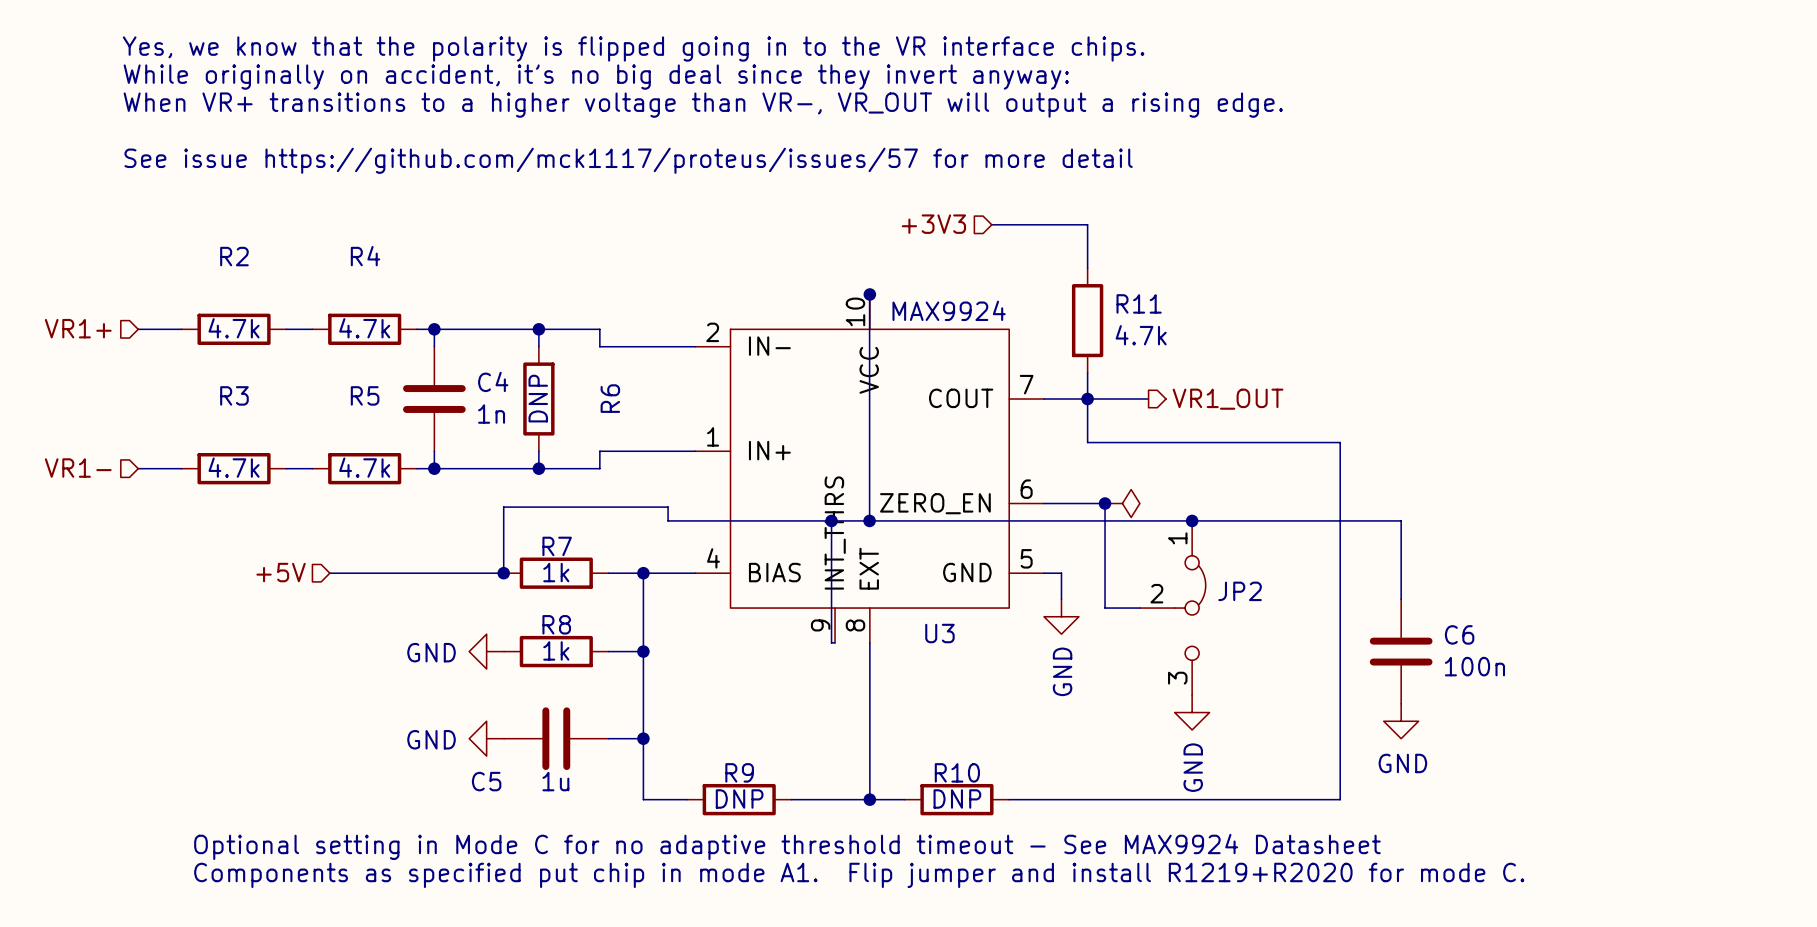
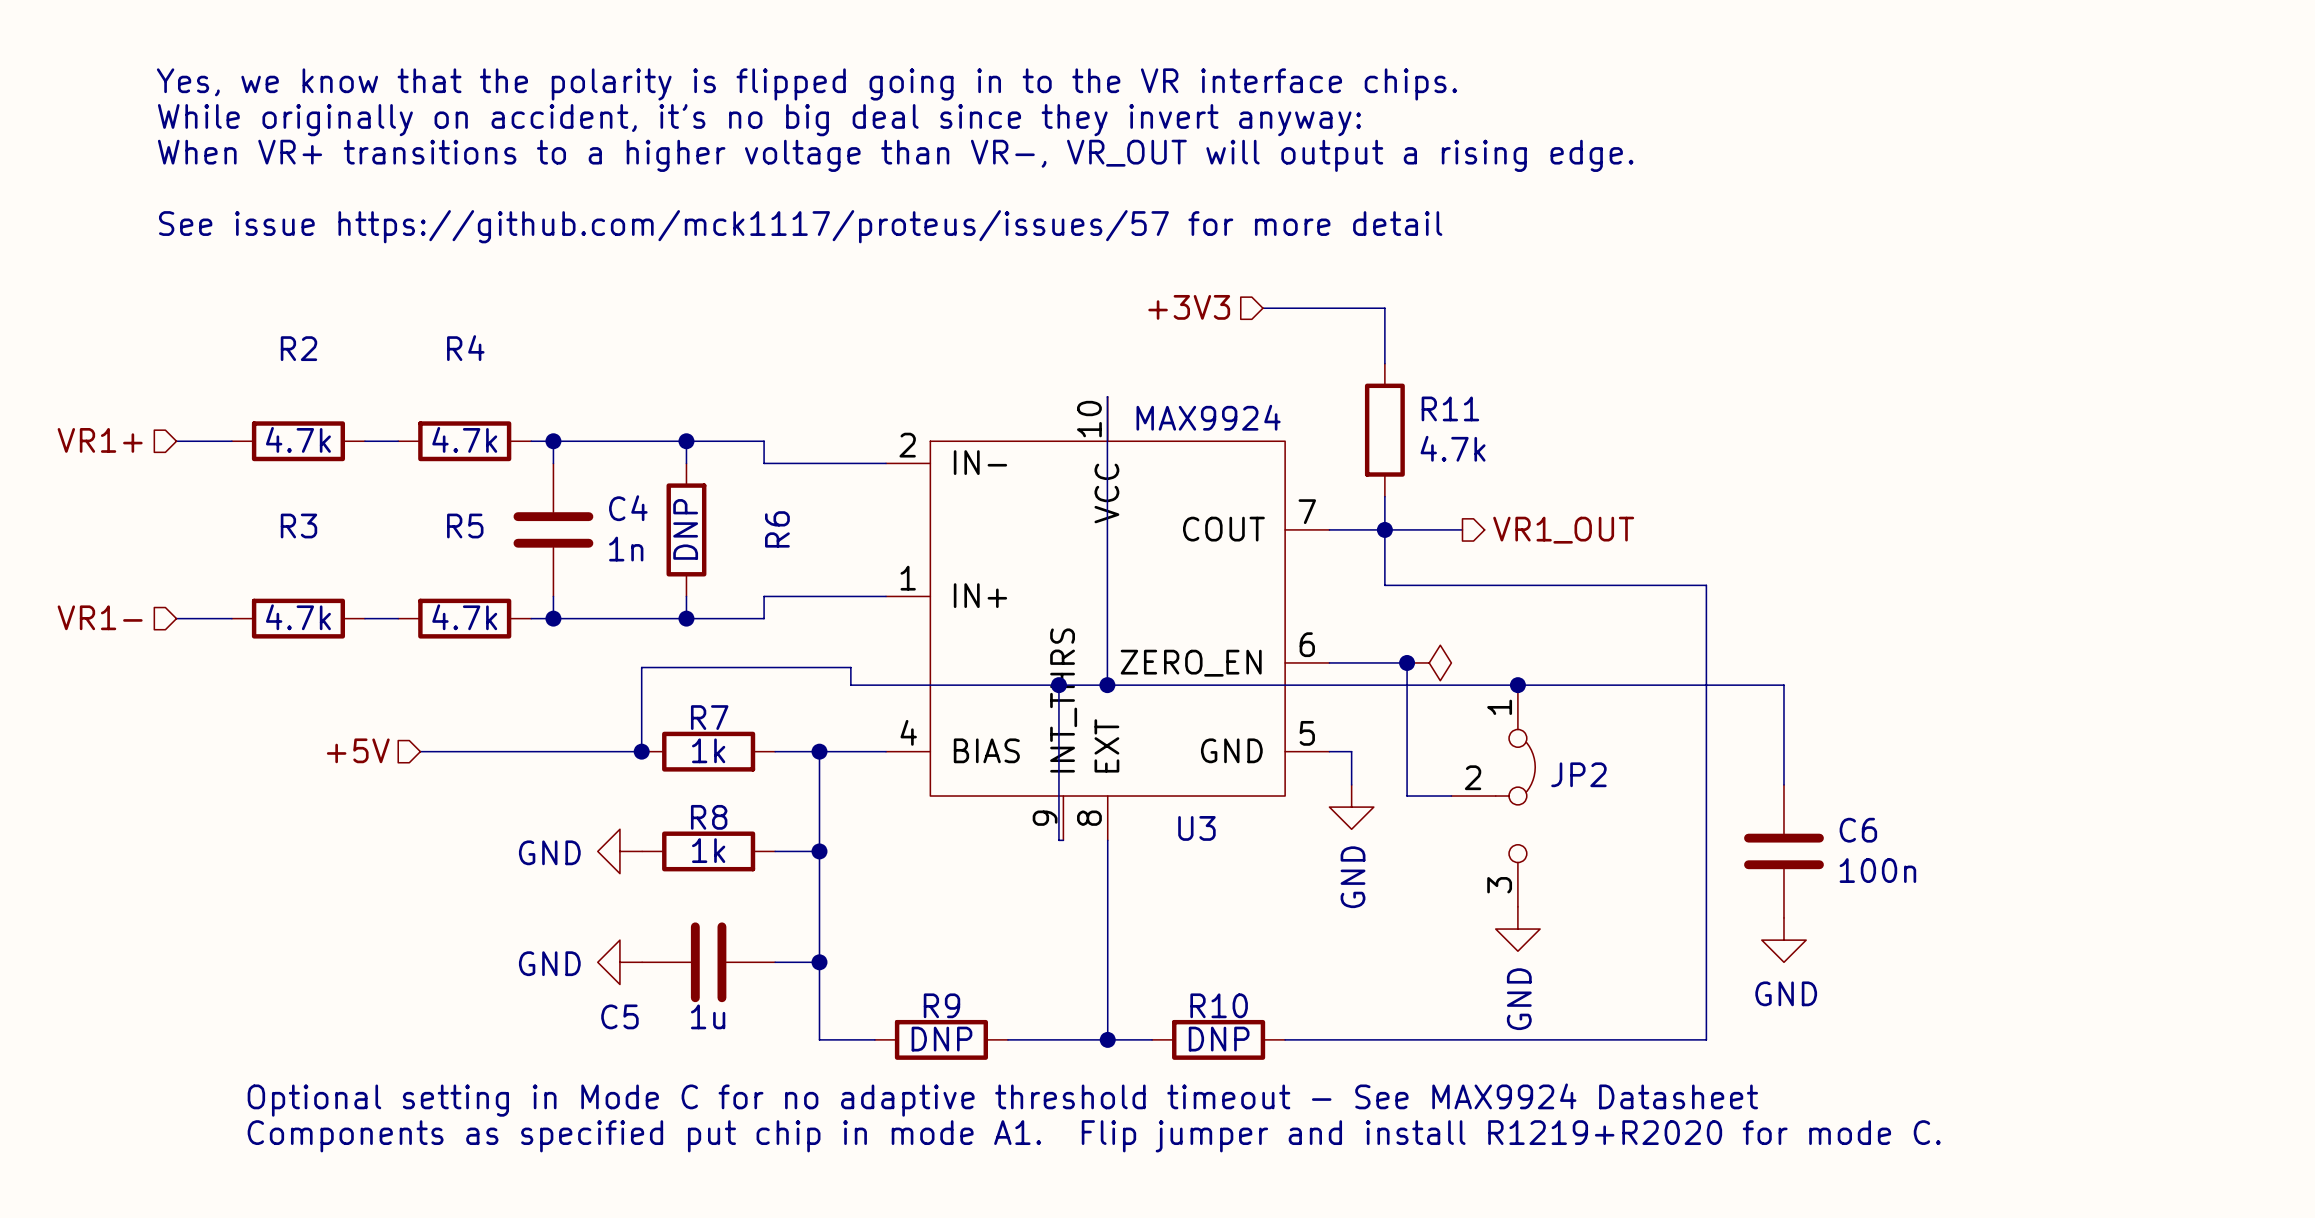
junction: (869, 294) -> none

